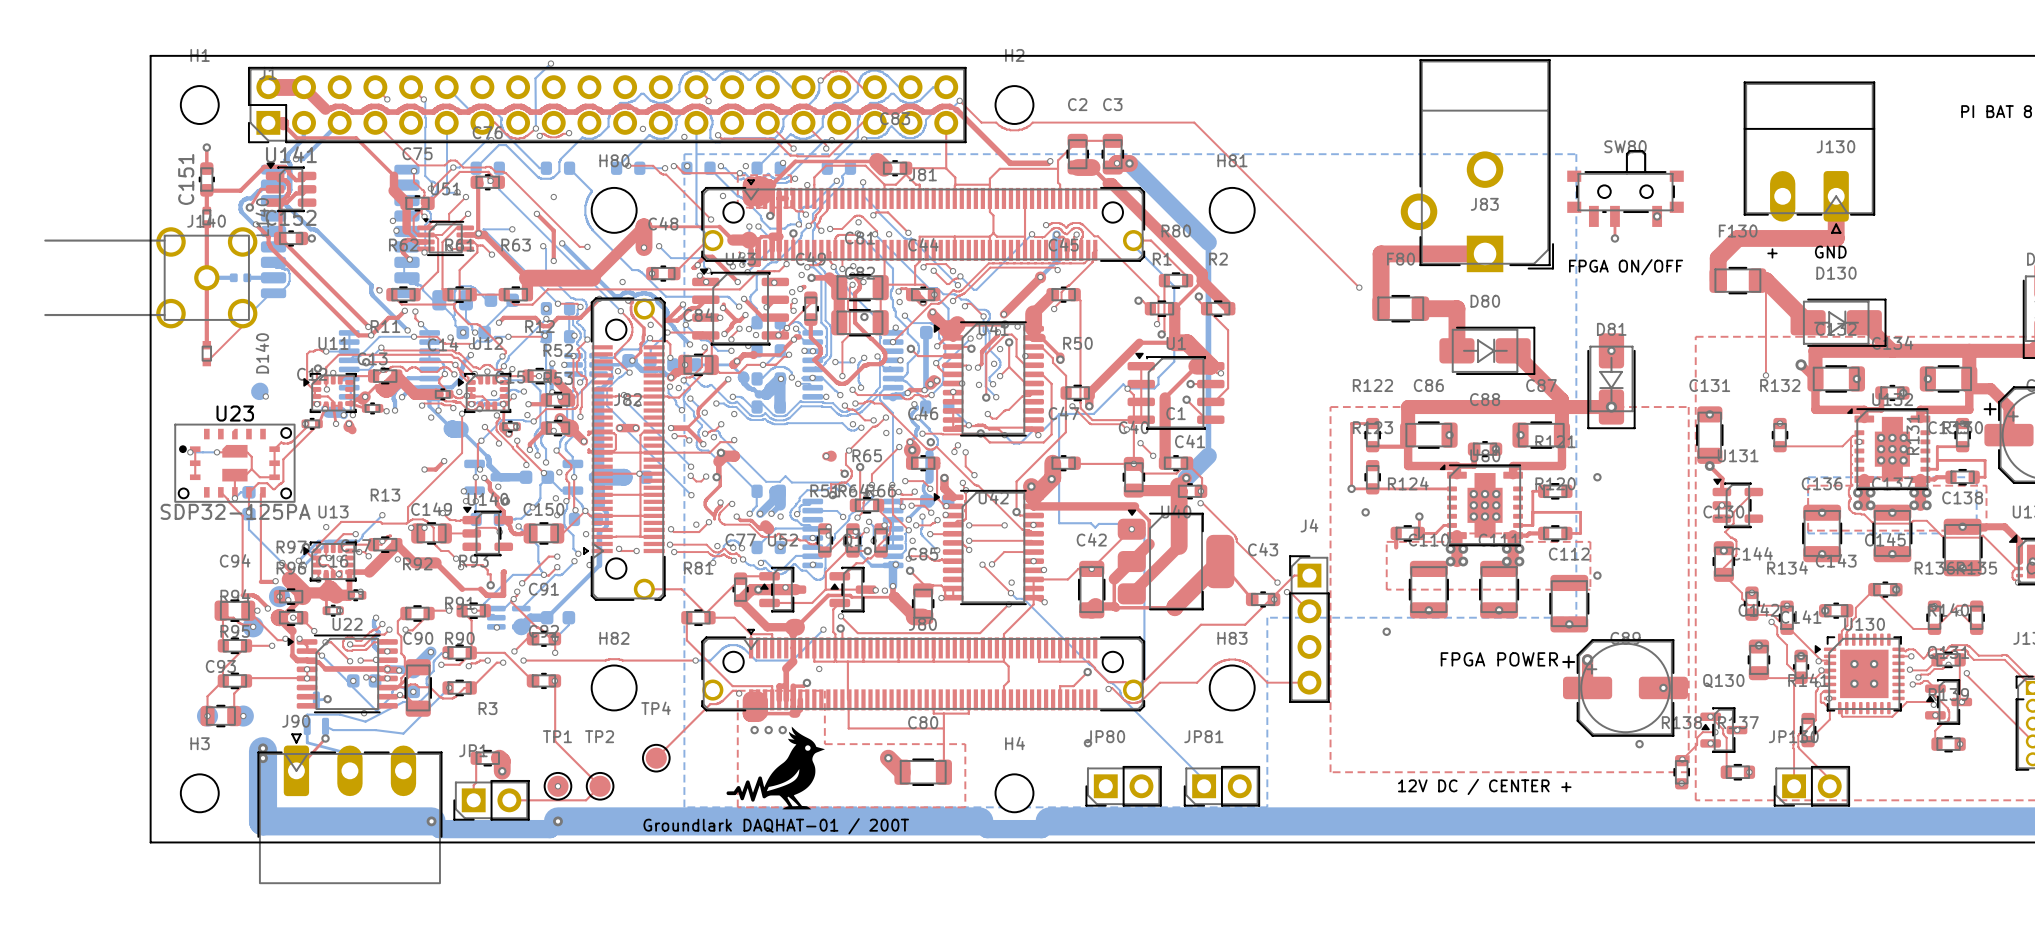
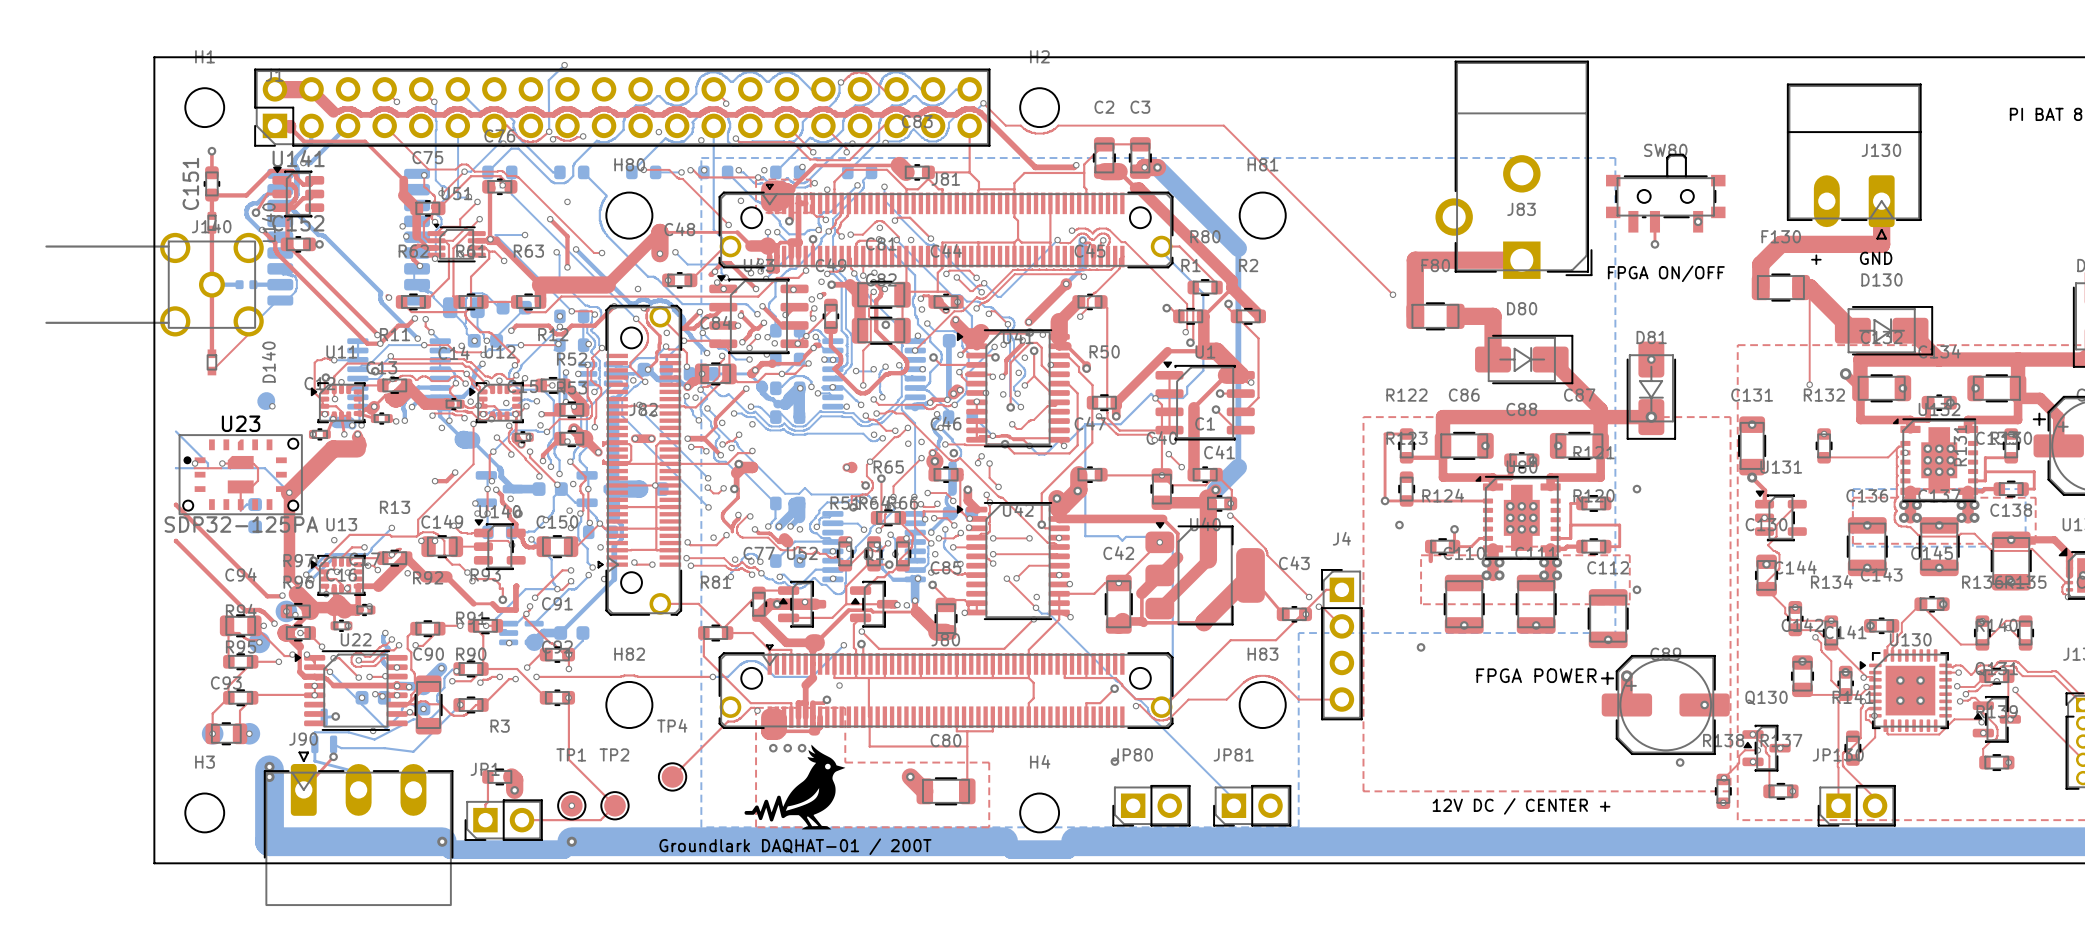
bottom track: none -> (175, 431) (207, 463) (207, 468)
top track: (305, 423) (305, 428) (292, 441) (281, 442) (274, 449) (274, 477) (259, 477) (251, 469) -> none
top track: (318, 423) (283, 459) (283, 481) (281, 483) (273, 489) (267, 483) (258, 483) (248, 492) (248, 512) -> none
top track: none -> (361, 440) (361, 445) (357, 448) (333, 448) (289, 492) (289, 576)
top track: (190, 452) (195, 449) (195, 477) -> none
bottom track: (190, 452) (217, 452) -> none
bottom track: none -> (175, 468) (194, 468)
top track: none -> (194, 468) (221, 468)
bottom track: none -> (221, 468) (264, 468) (289, 492)
via: none -> (289, 492)
top track: (220, 492) (242, 515) (242, 595) -> (175, 541) (246, 611) (248, 609)
top track: (263, 492) (260, 494) (260, 581) -> (175, 504) (267, 596)
via: (234, 498) -> none
bottom track: (248, 512) (248, 529) (282, 562) -> none
via: (248, 512) -> none
via: (282, 562) -> none

